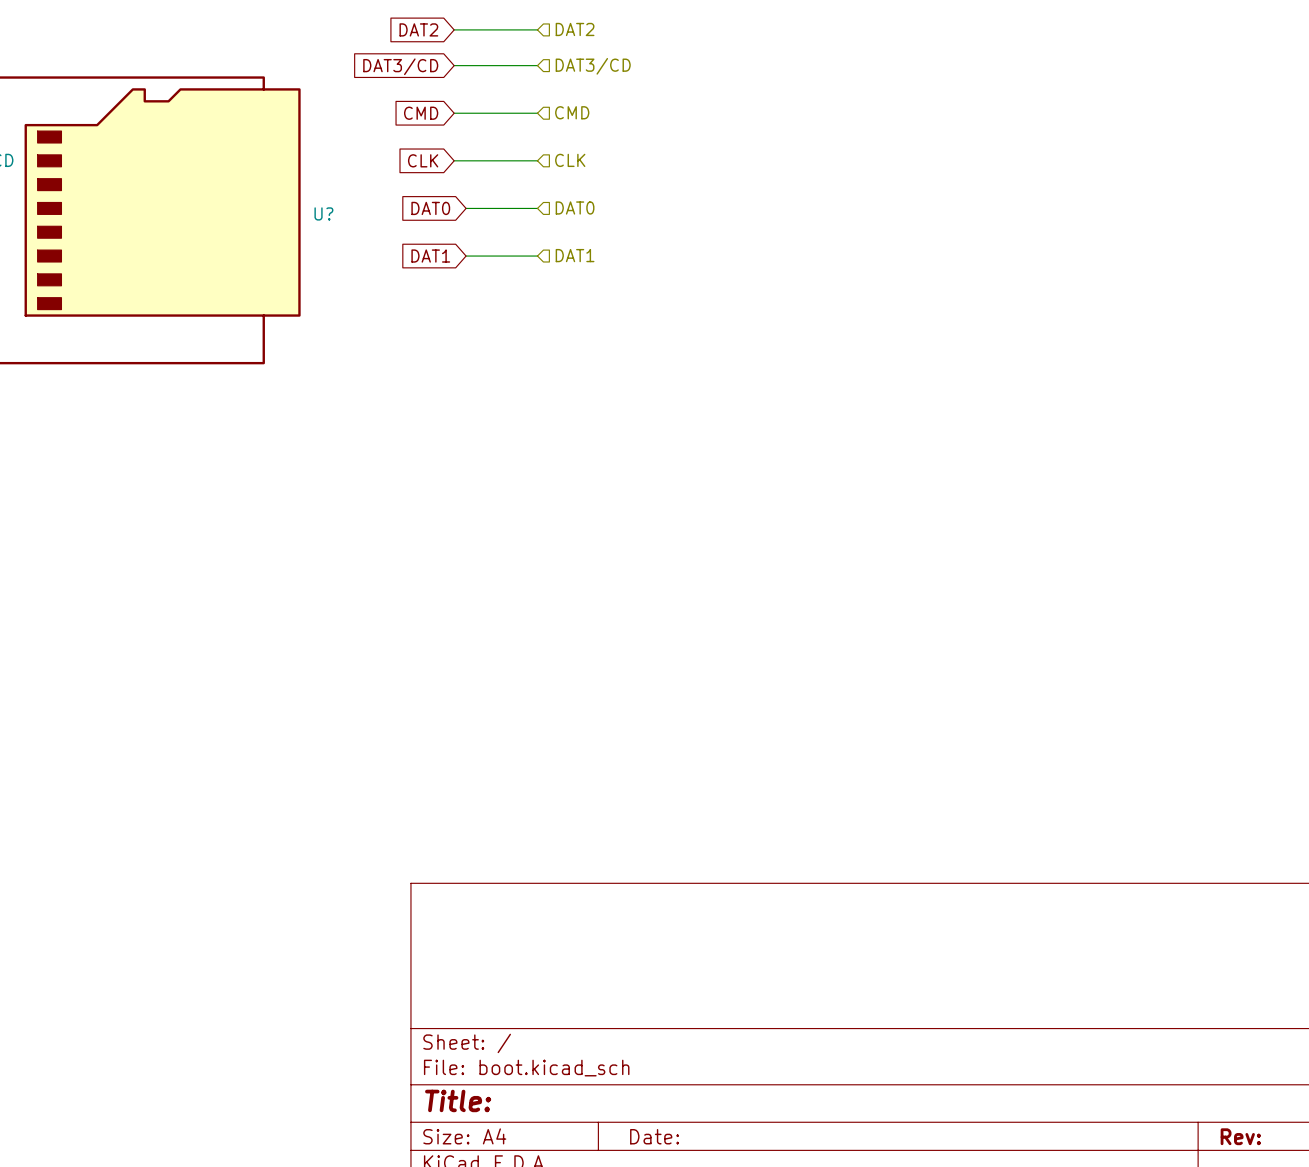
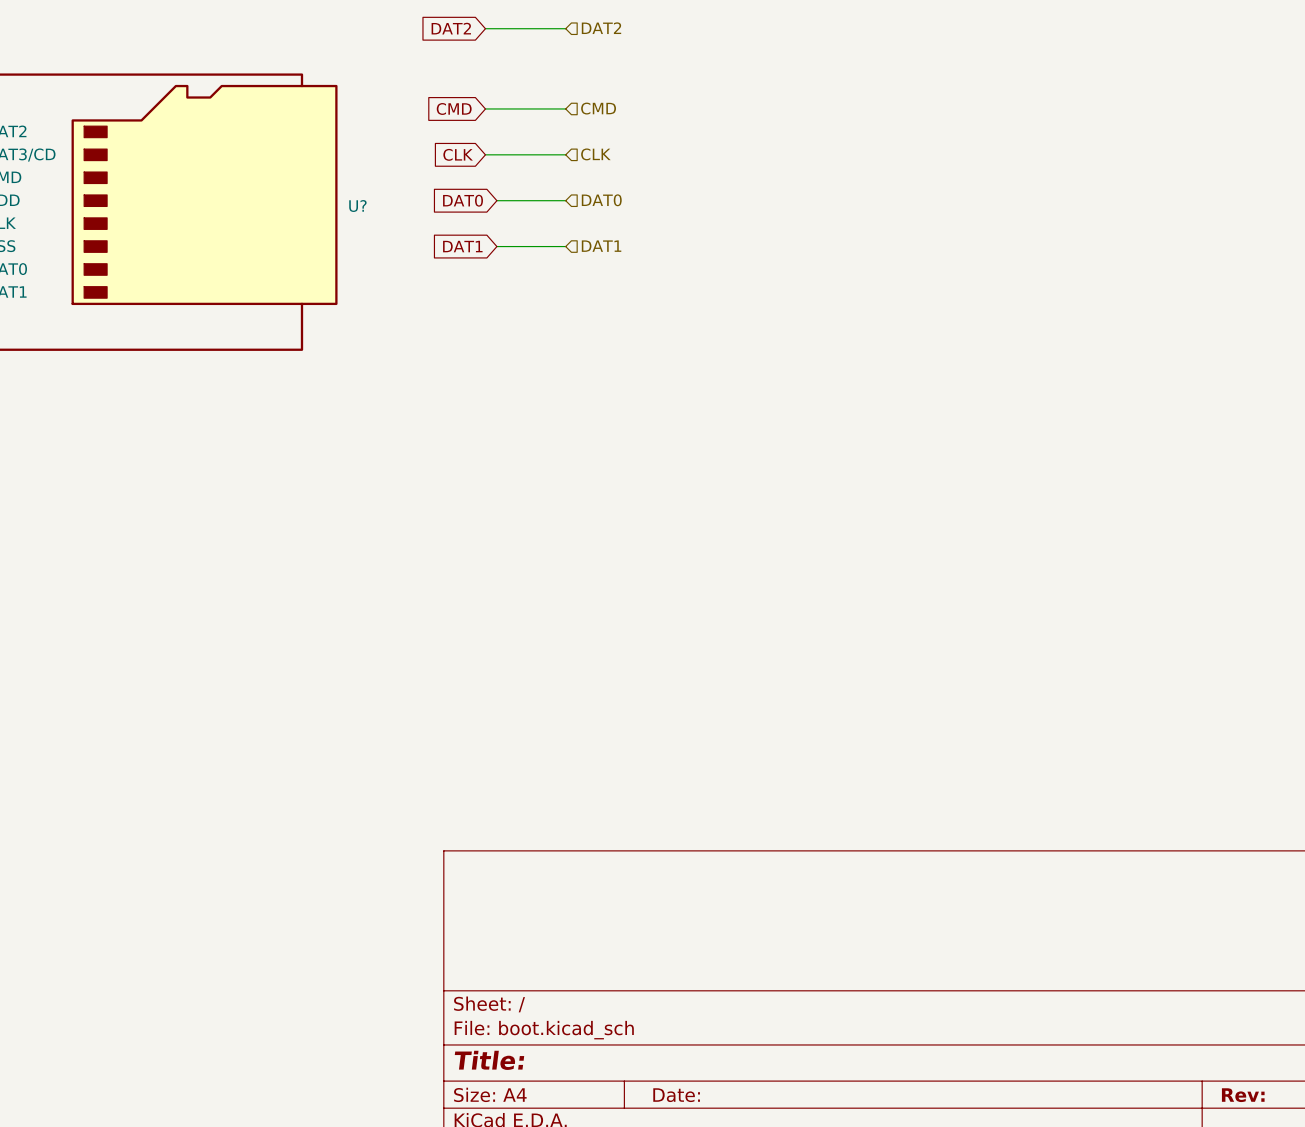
wire: (454, 65) (537, 65) -> none
global label: DAT3/CD (400, 66) -> none
hierarchical label: DAT3/CD (593, 66) -> none

